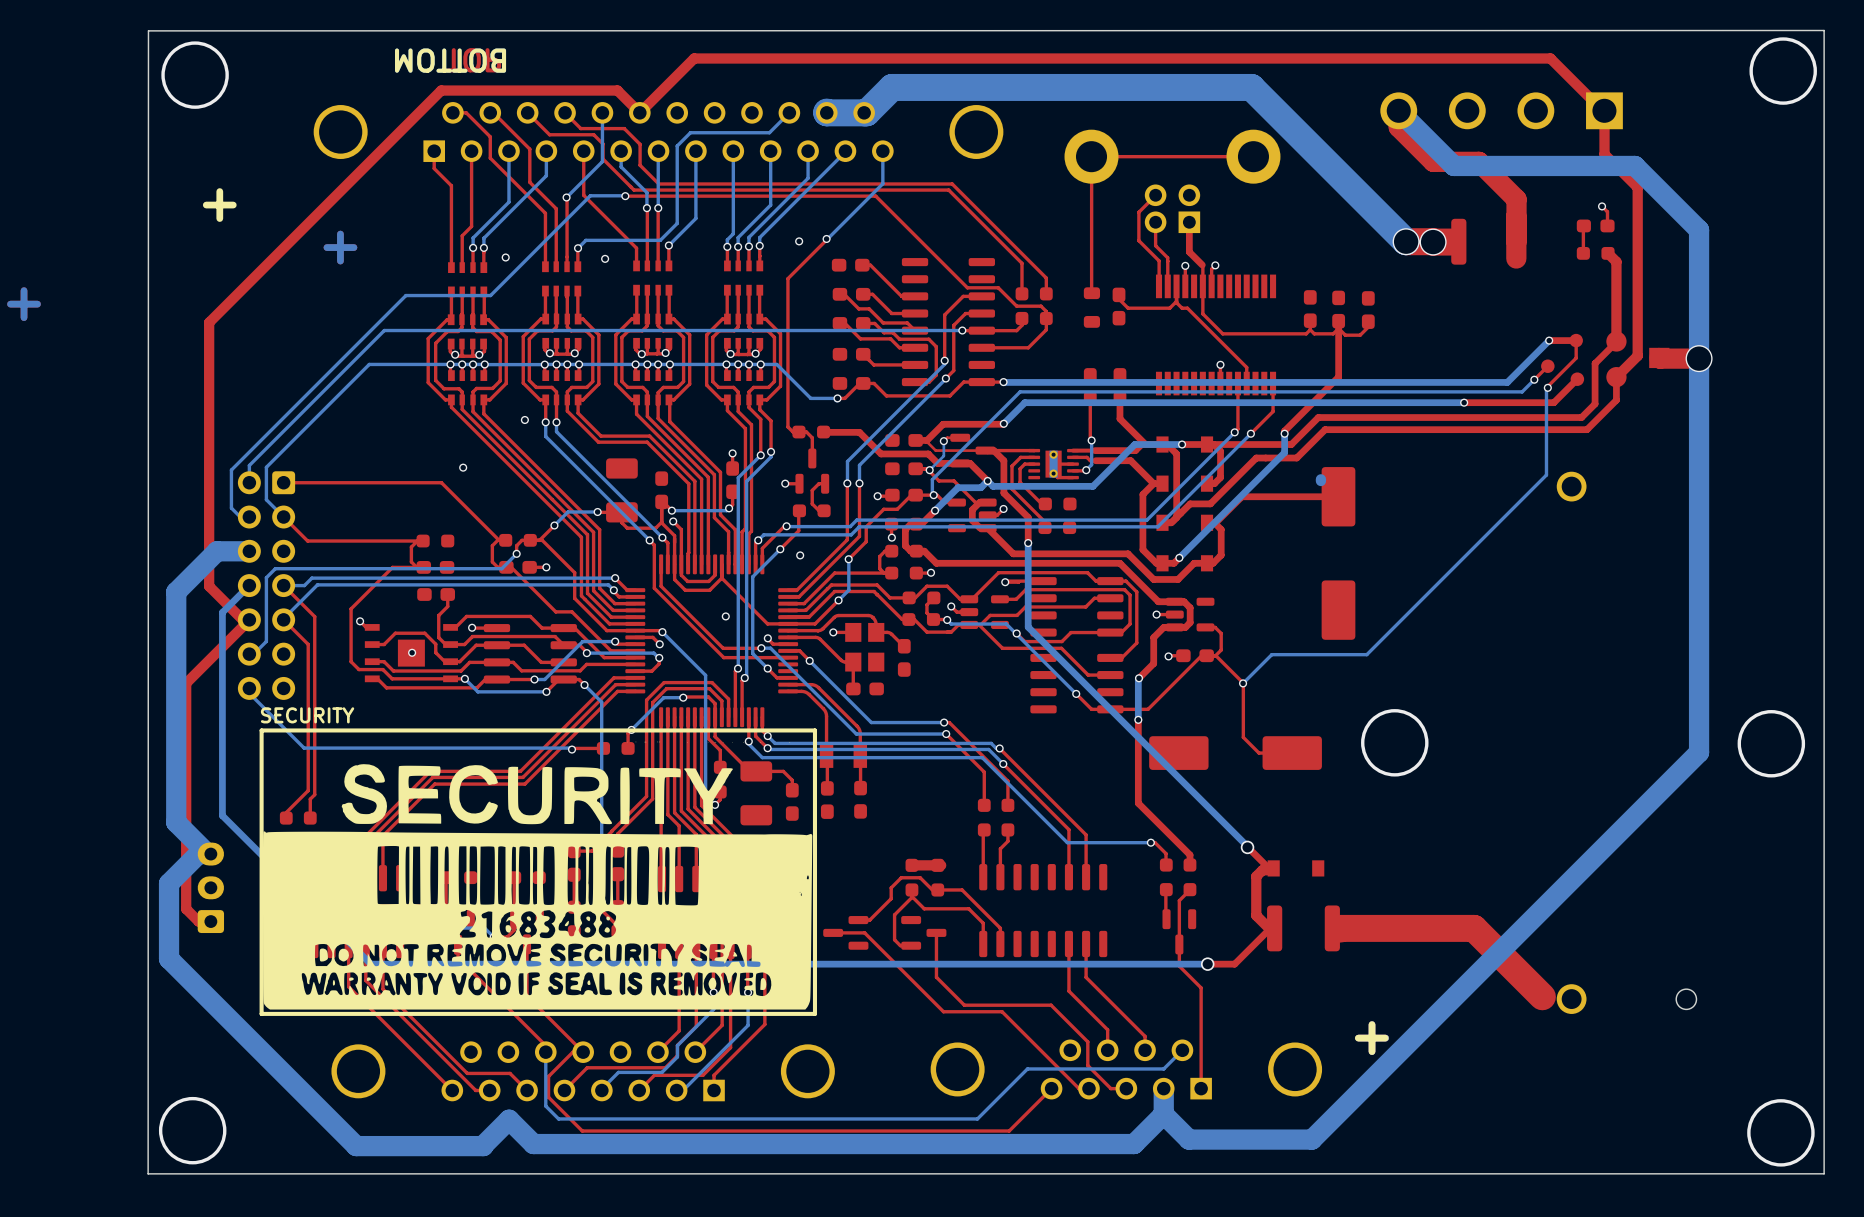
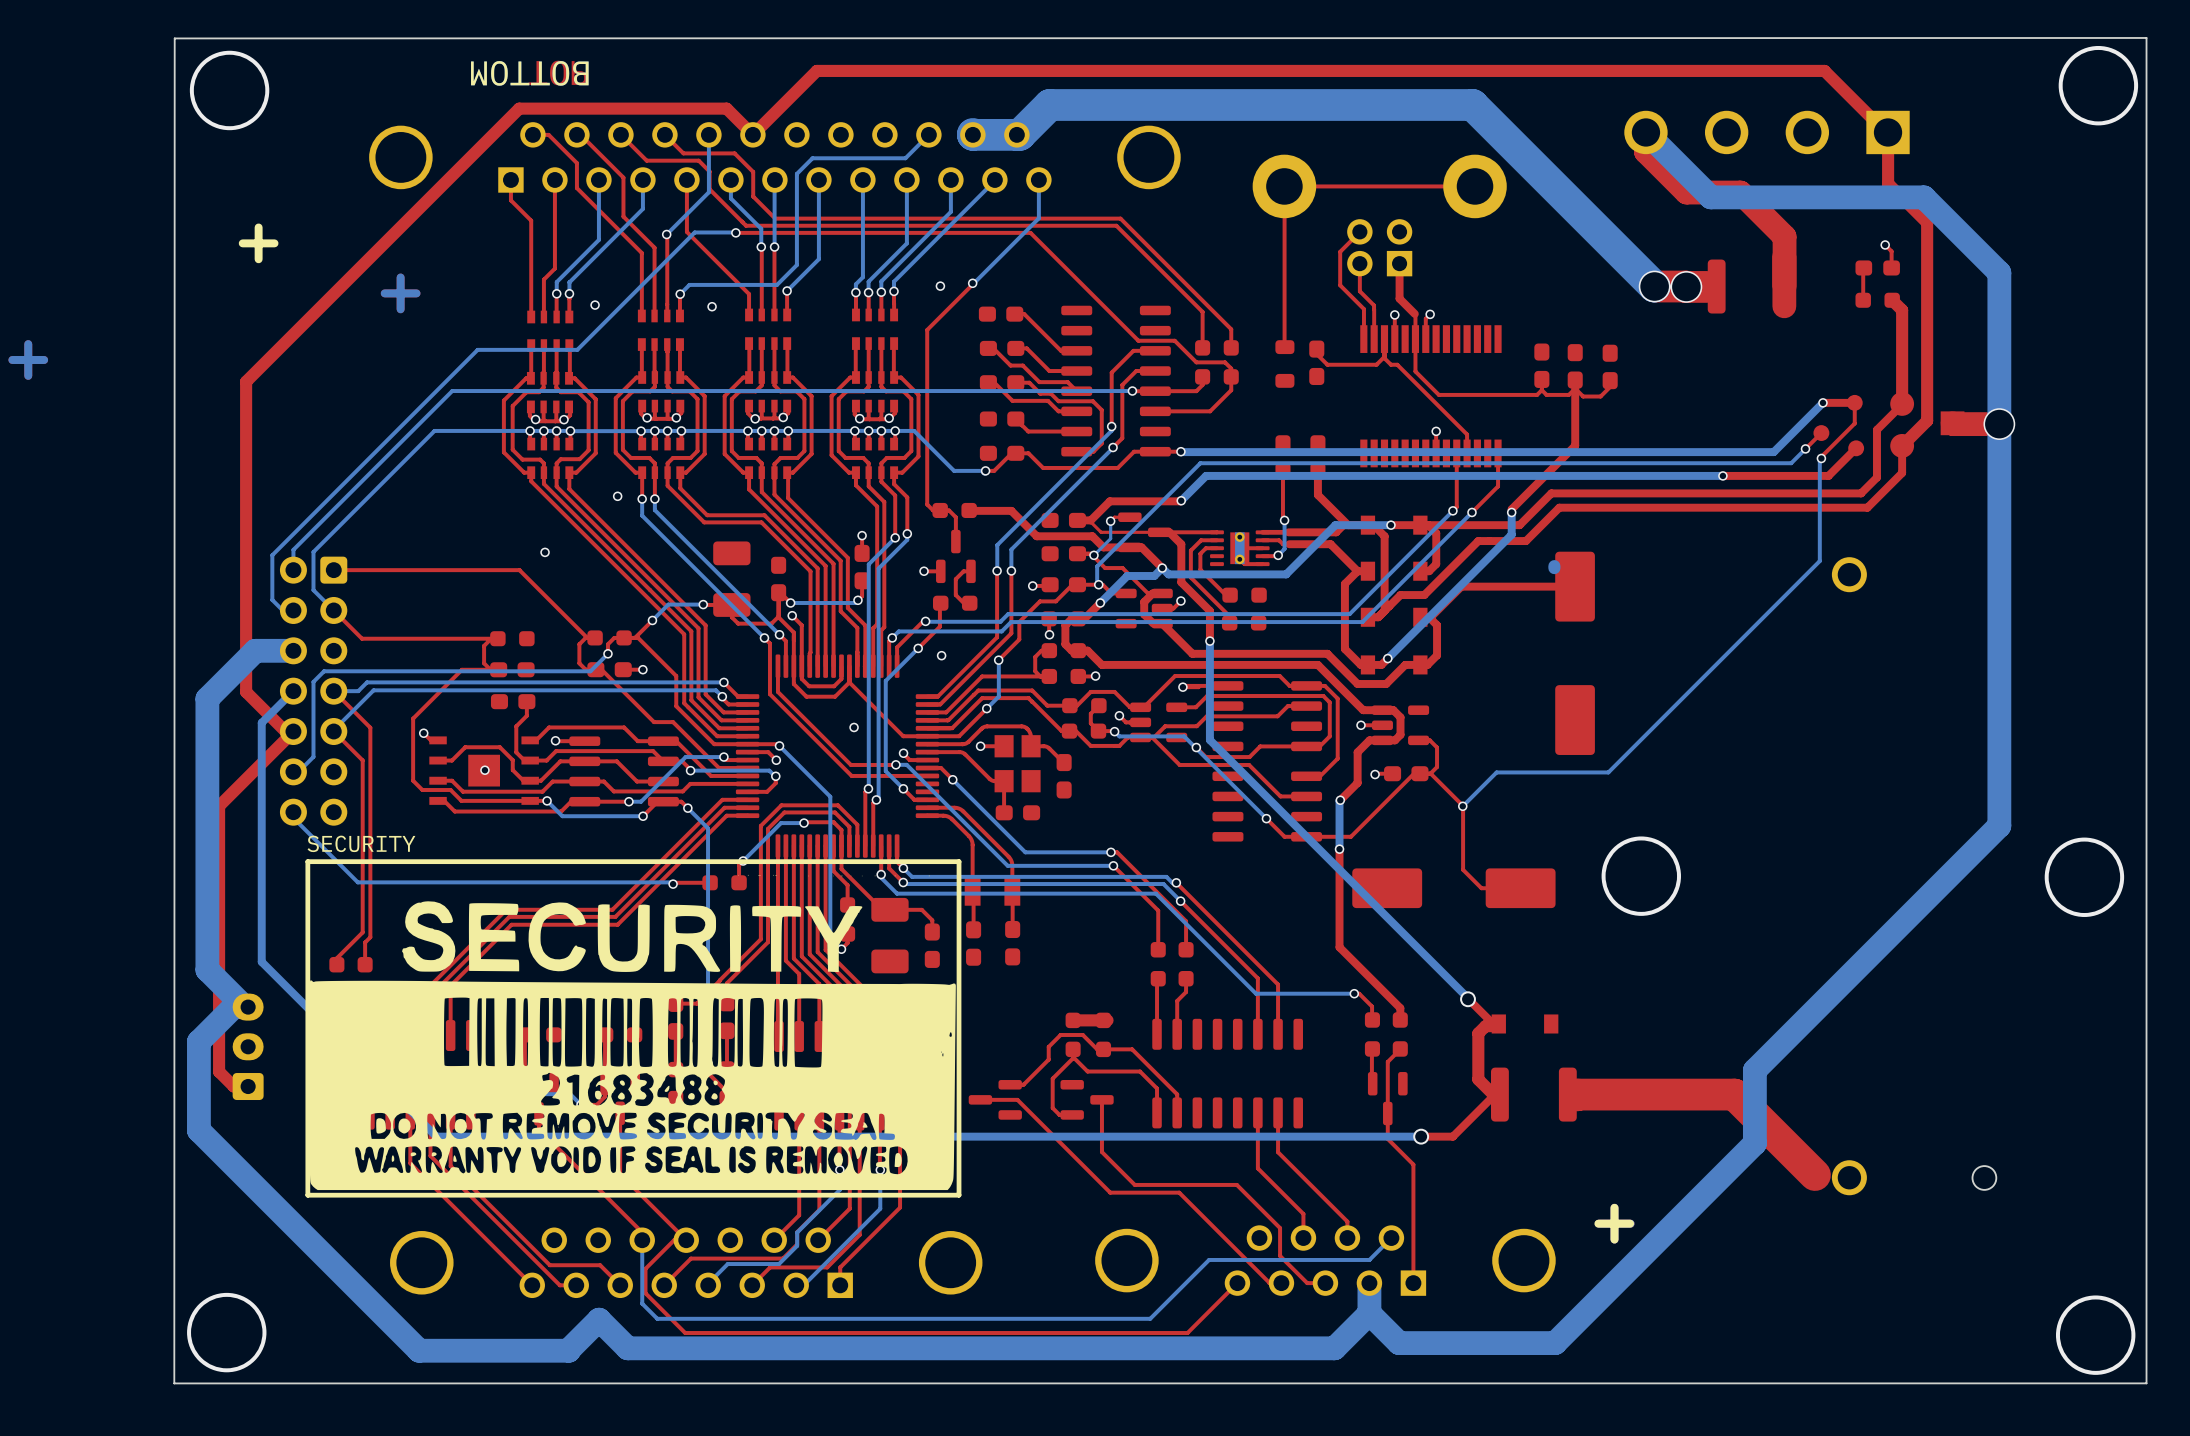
bottom track: (1699, 700) (1699, 752) (1312, 1139) -> (1999, 825) (1754, 1070) (1754, 1143) (1555, 1343) (1543, 1343)

